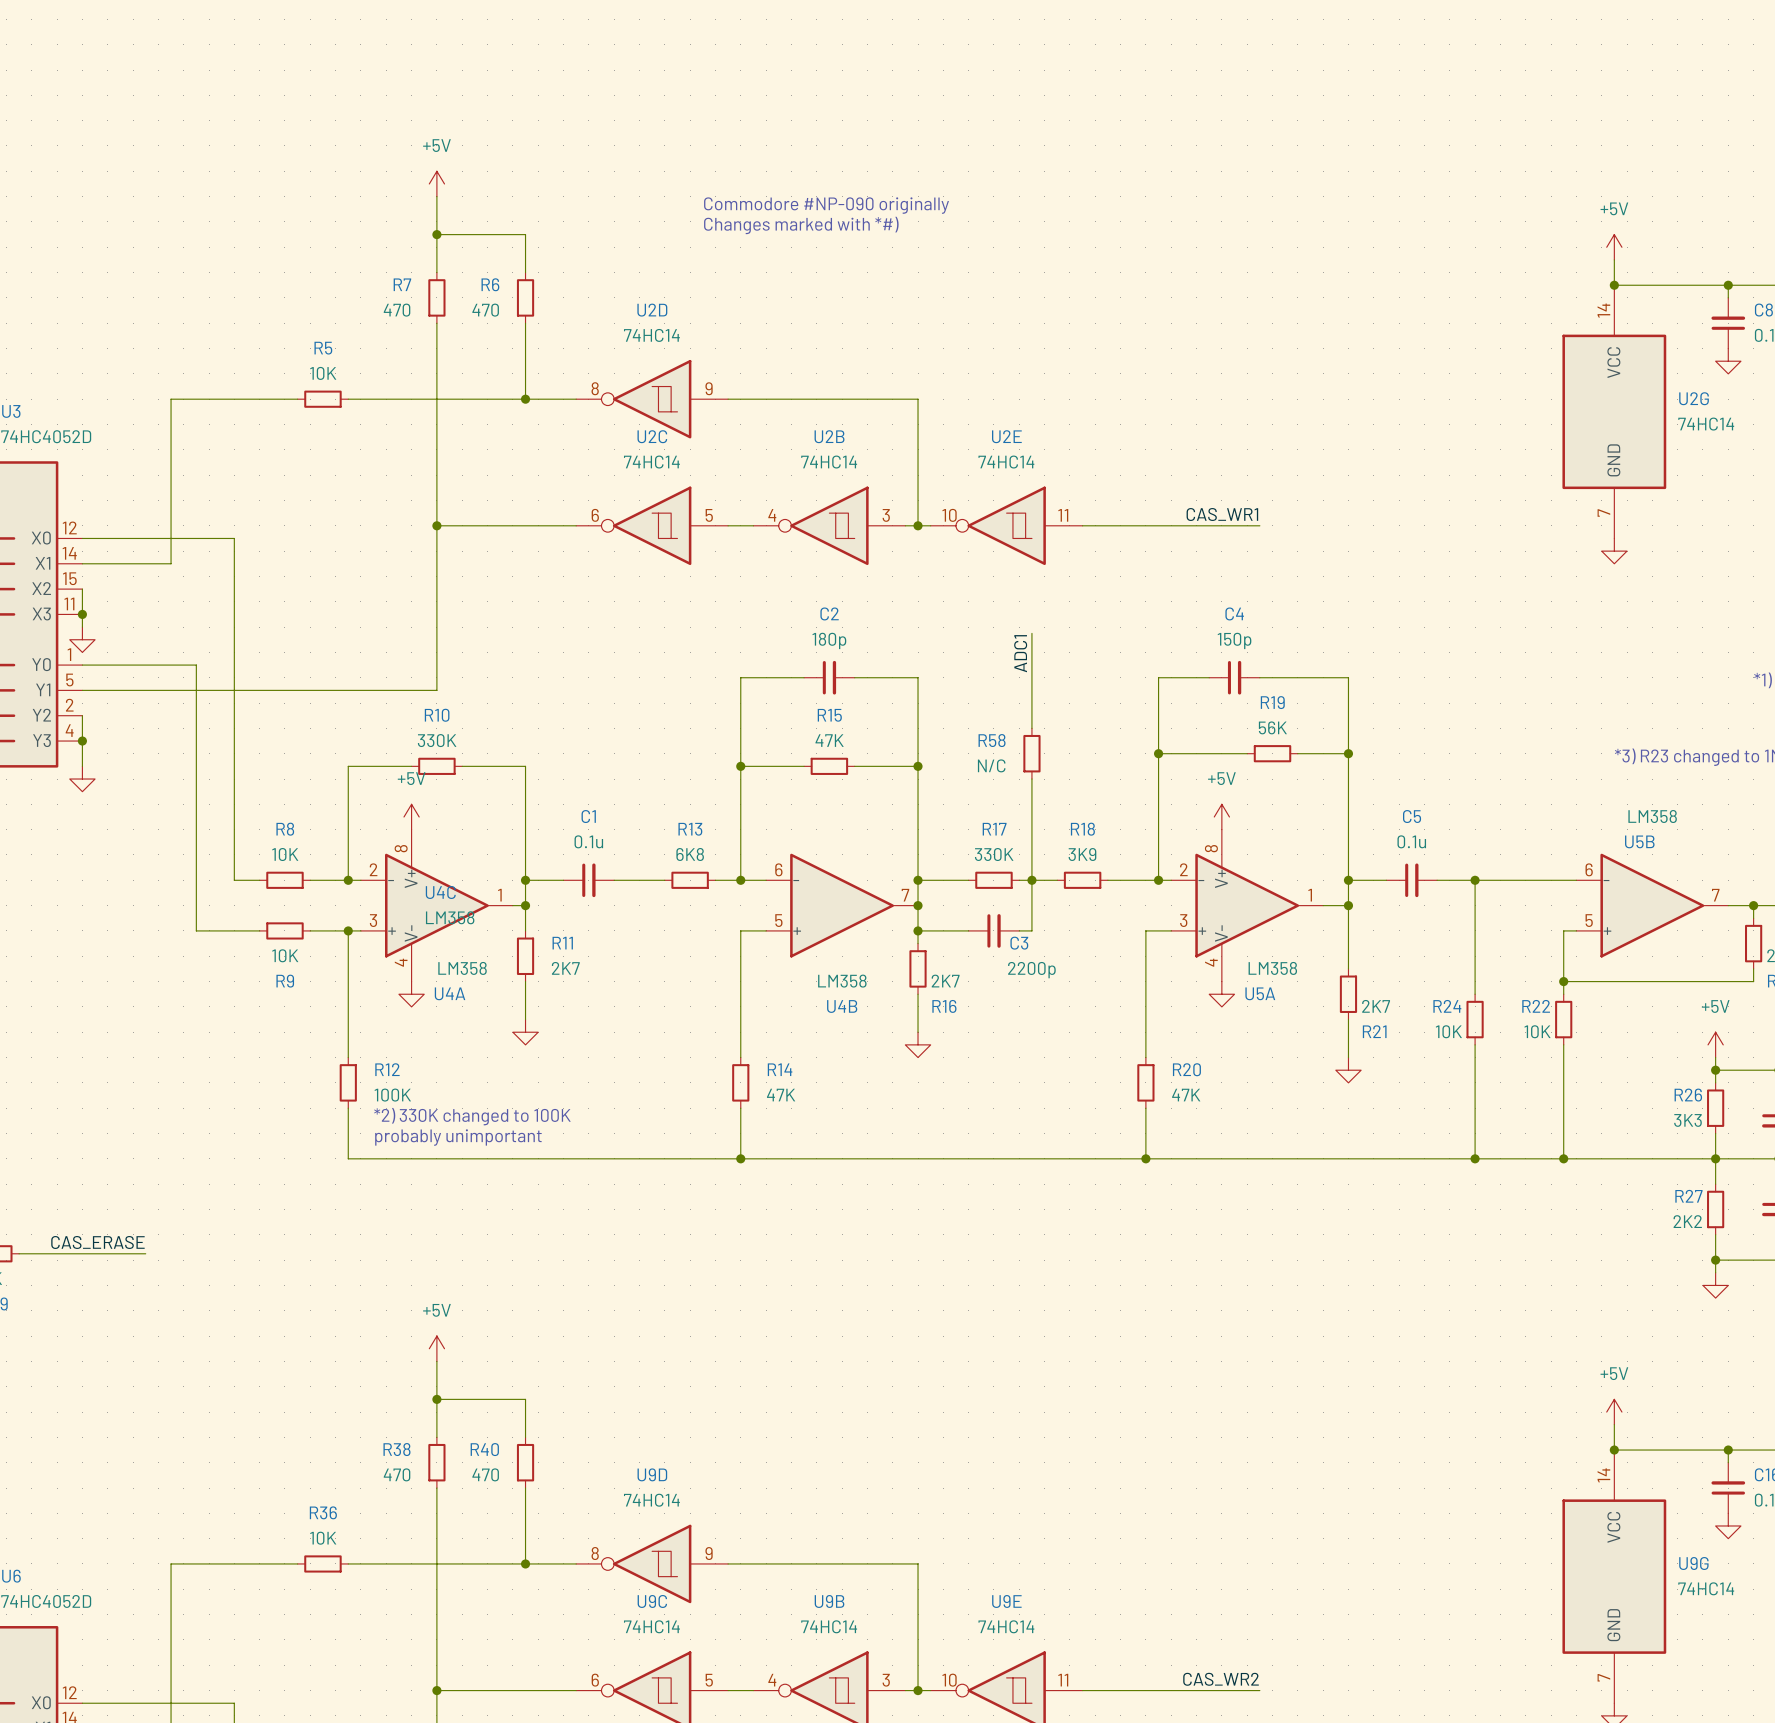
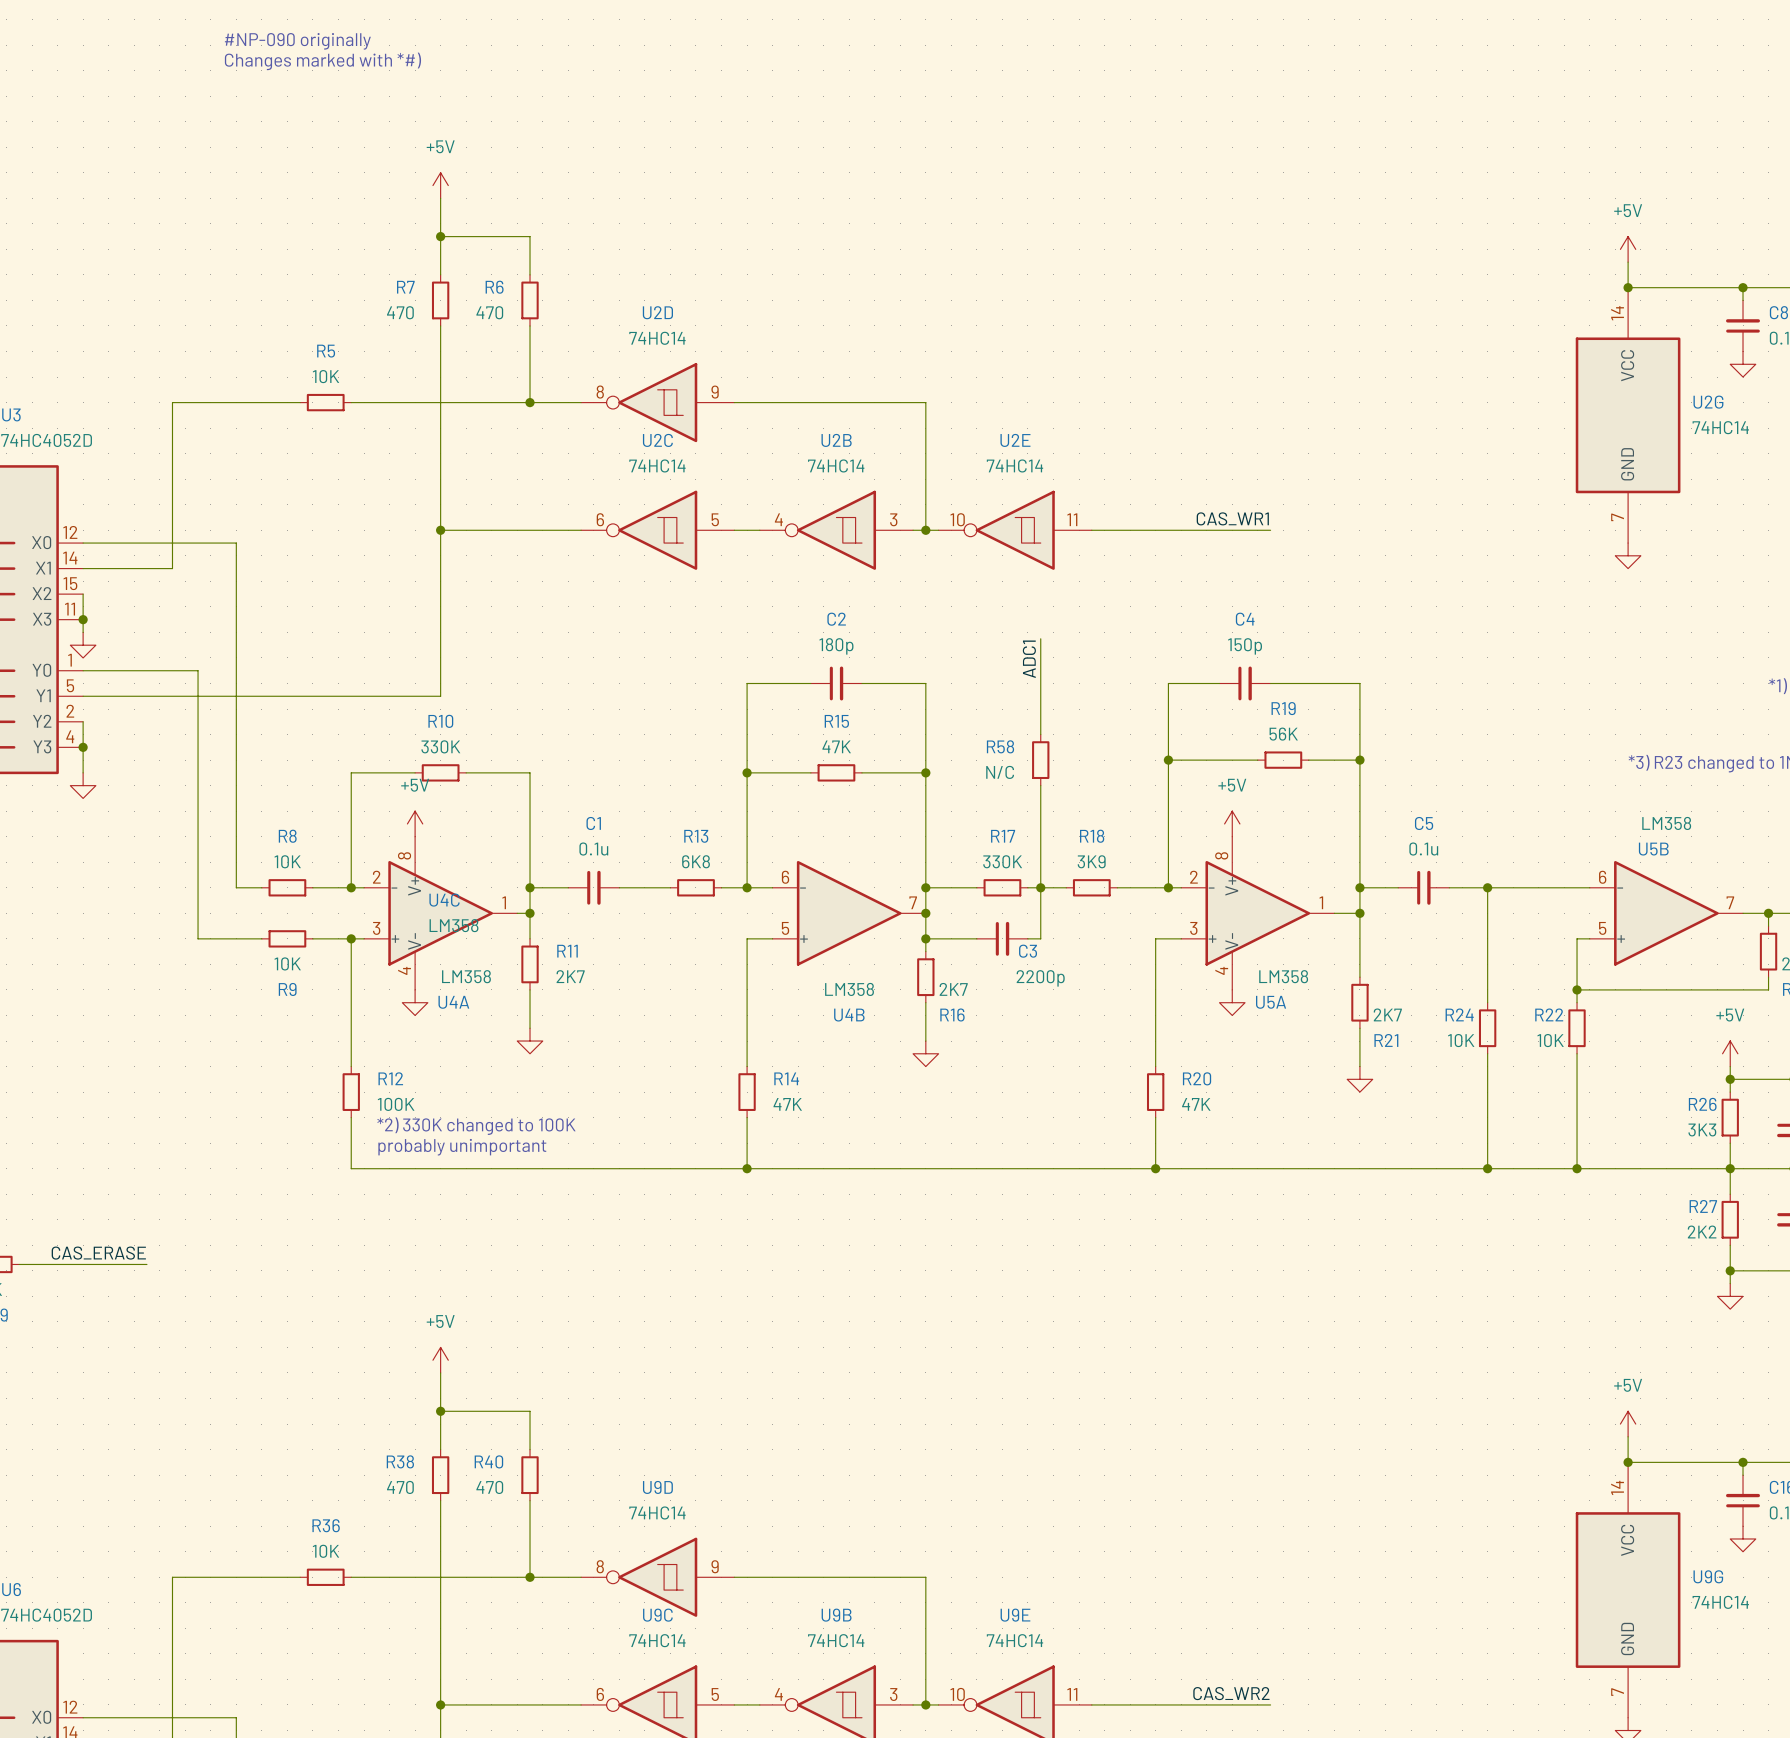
text: none -> #NP-090 originally (297, 41)
text: none -> Changes marked with *#) (322, 61)
text: Commodore #NP-090 originally (826, 205) -> none
text: Changes marked with *#) (801, 225) -> none

